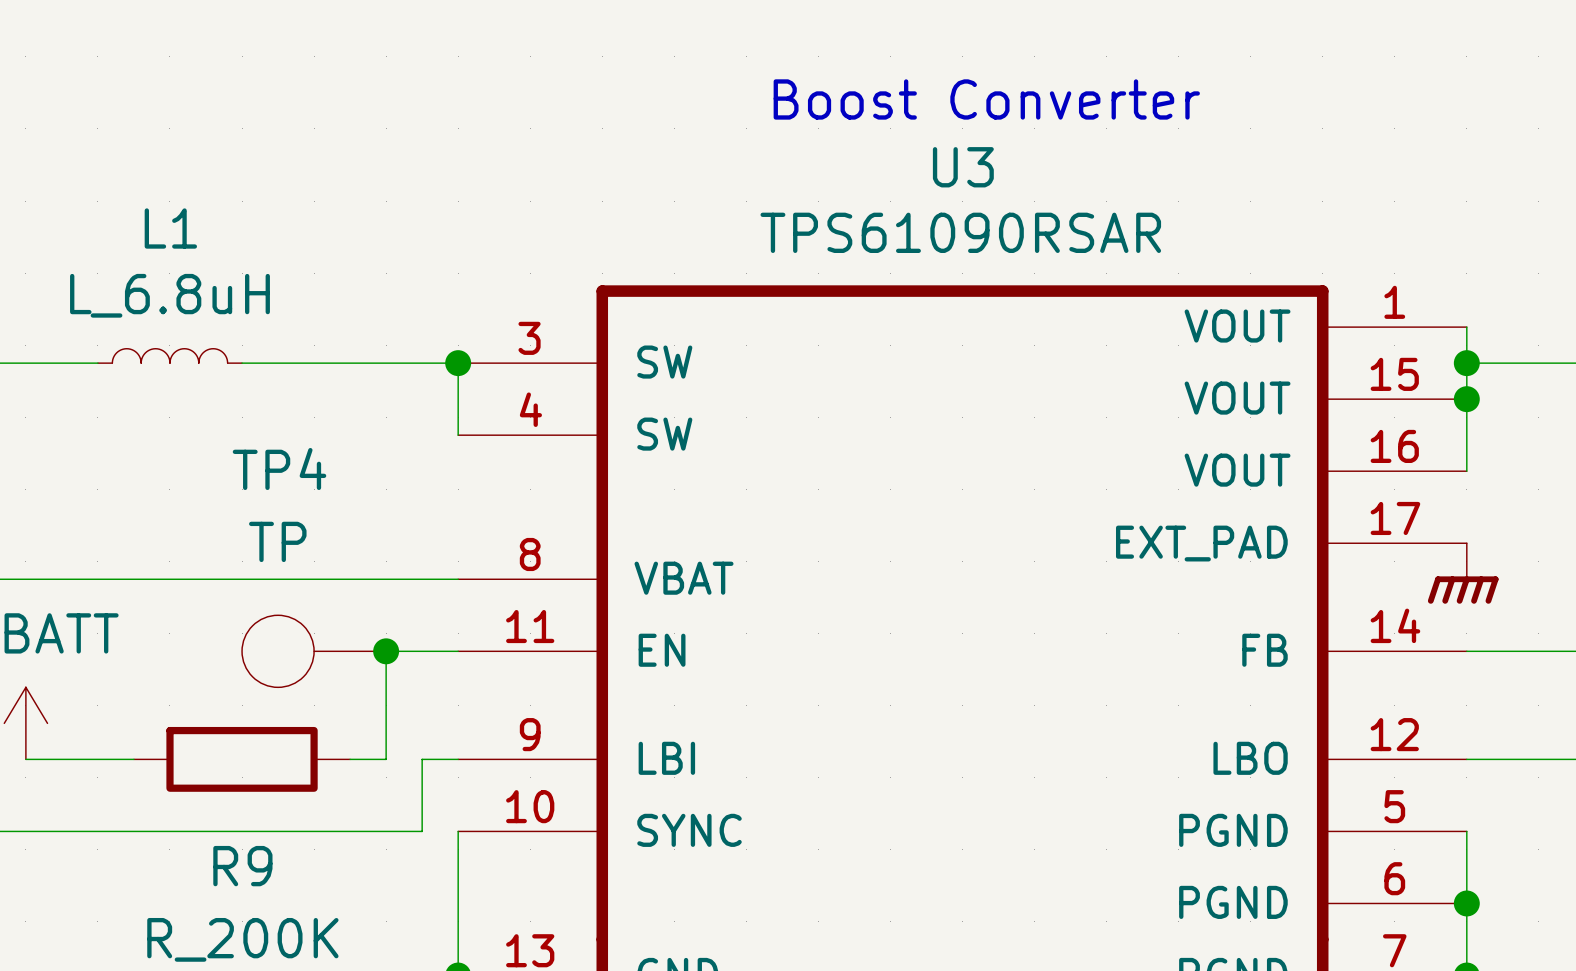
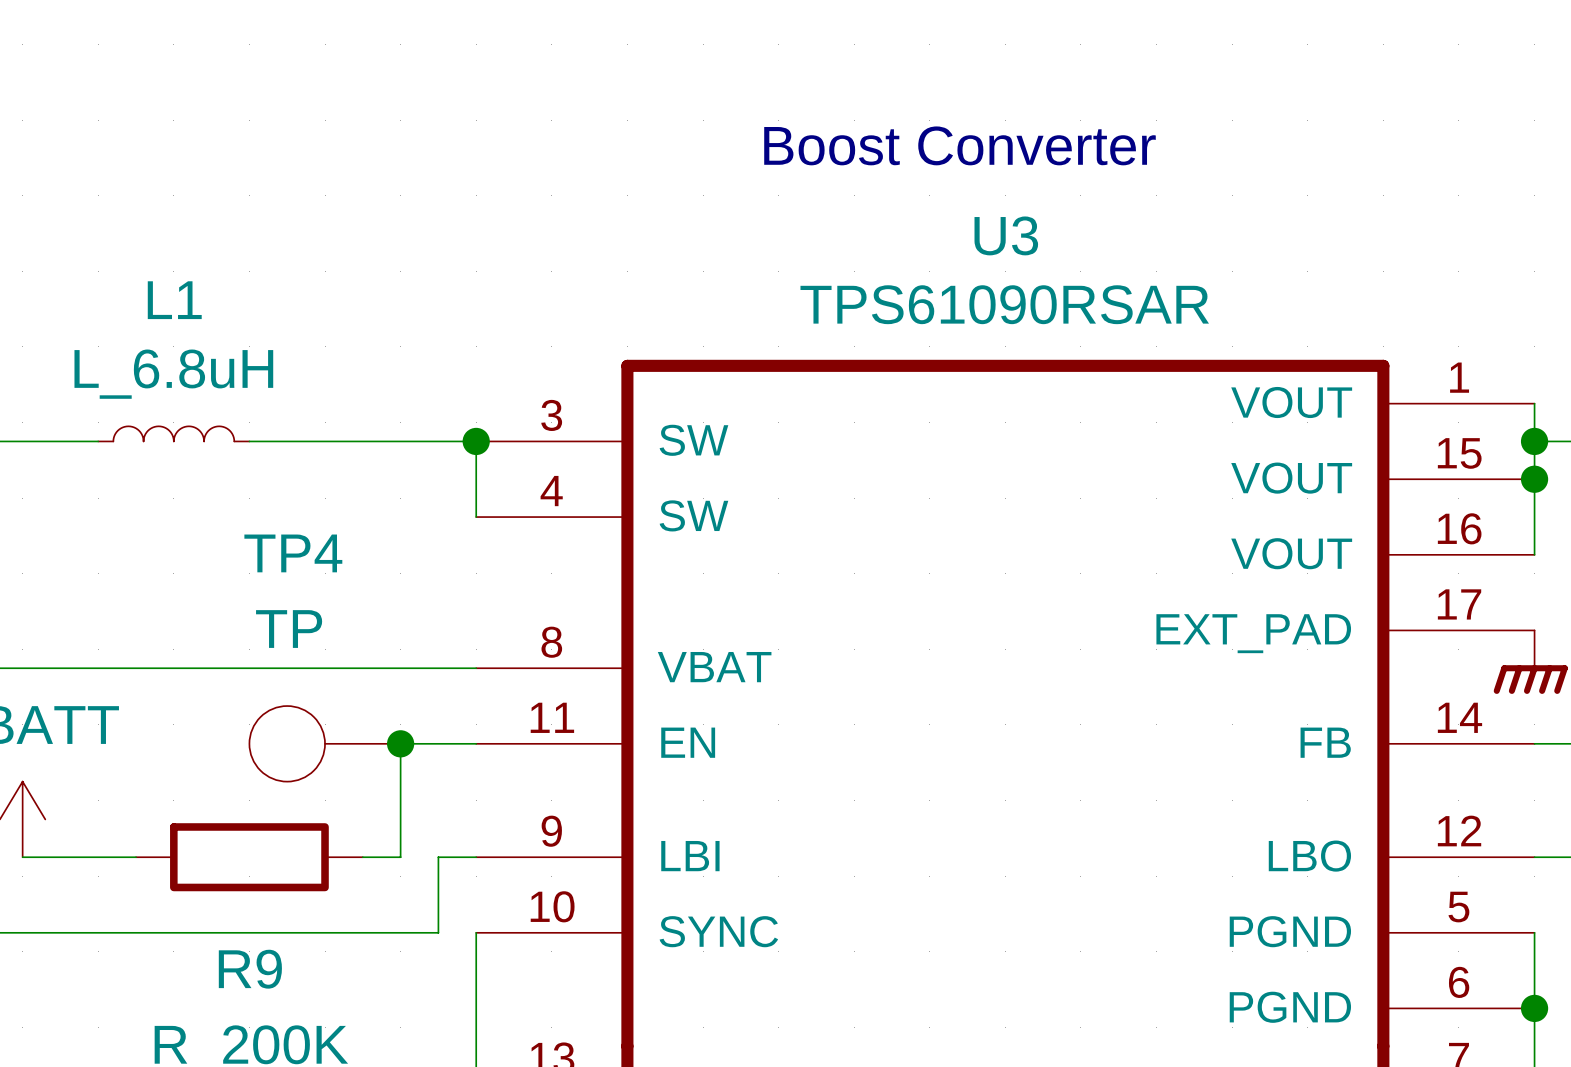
text position: Boost Converter (986, 99) -> Boost Converter (959, 145)

